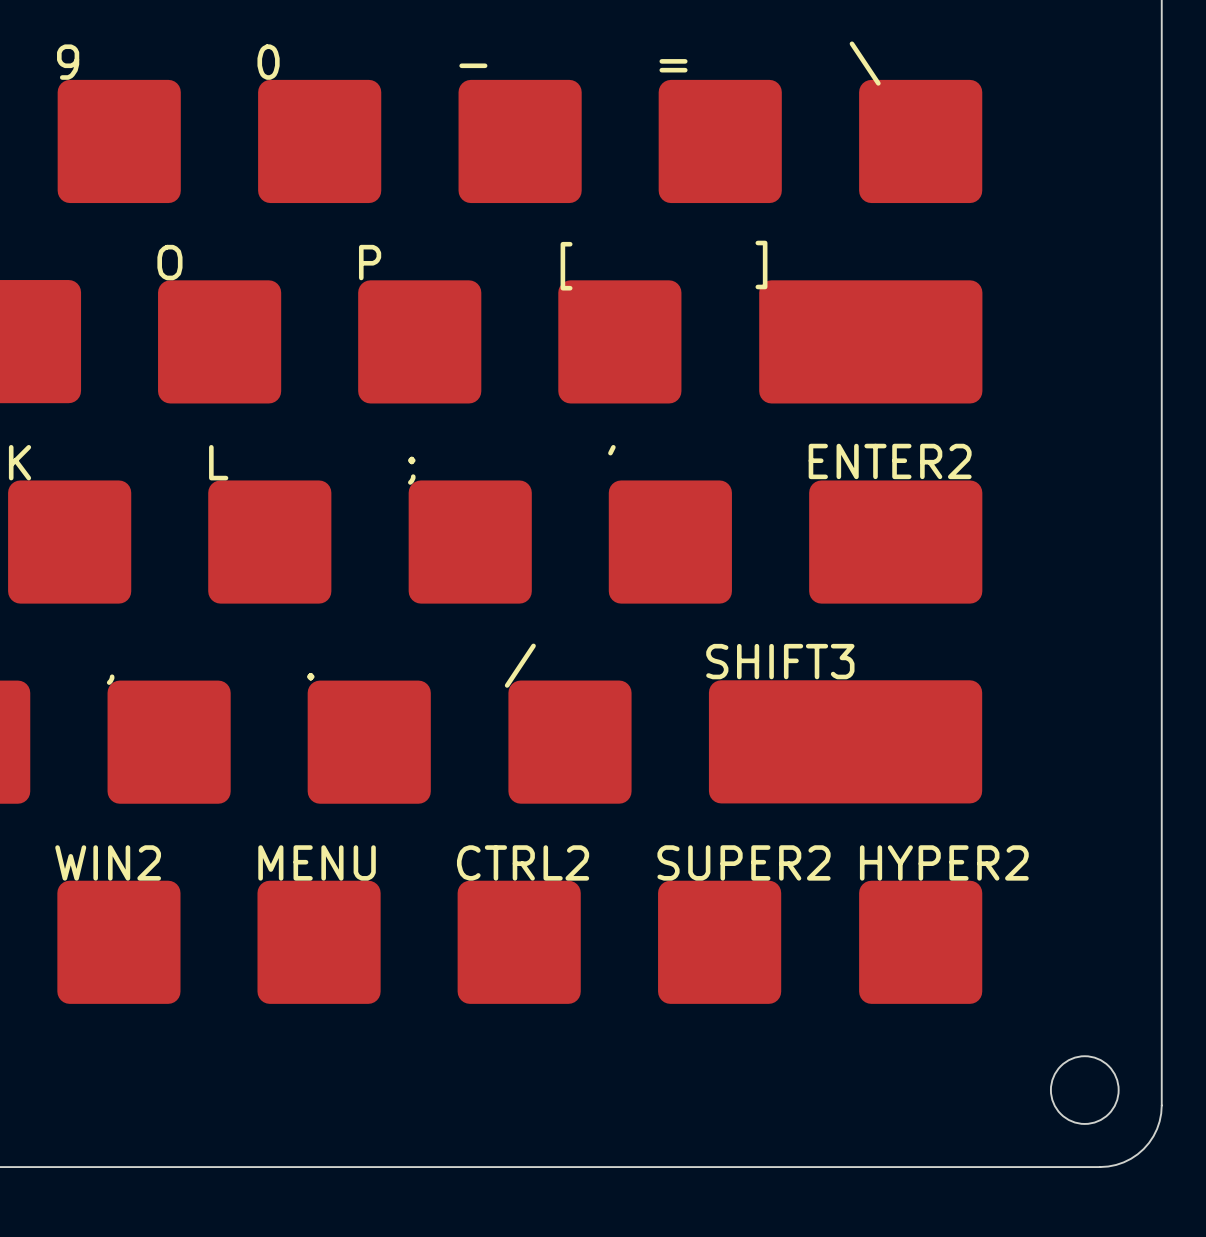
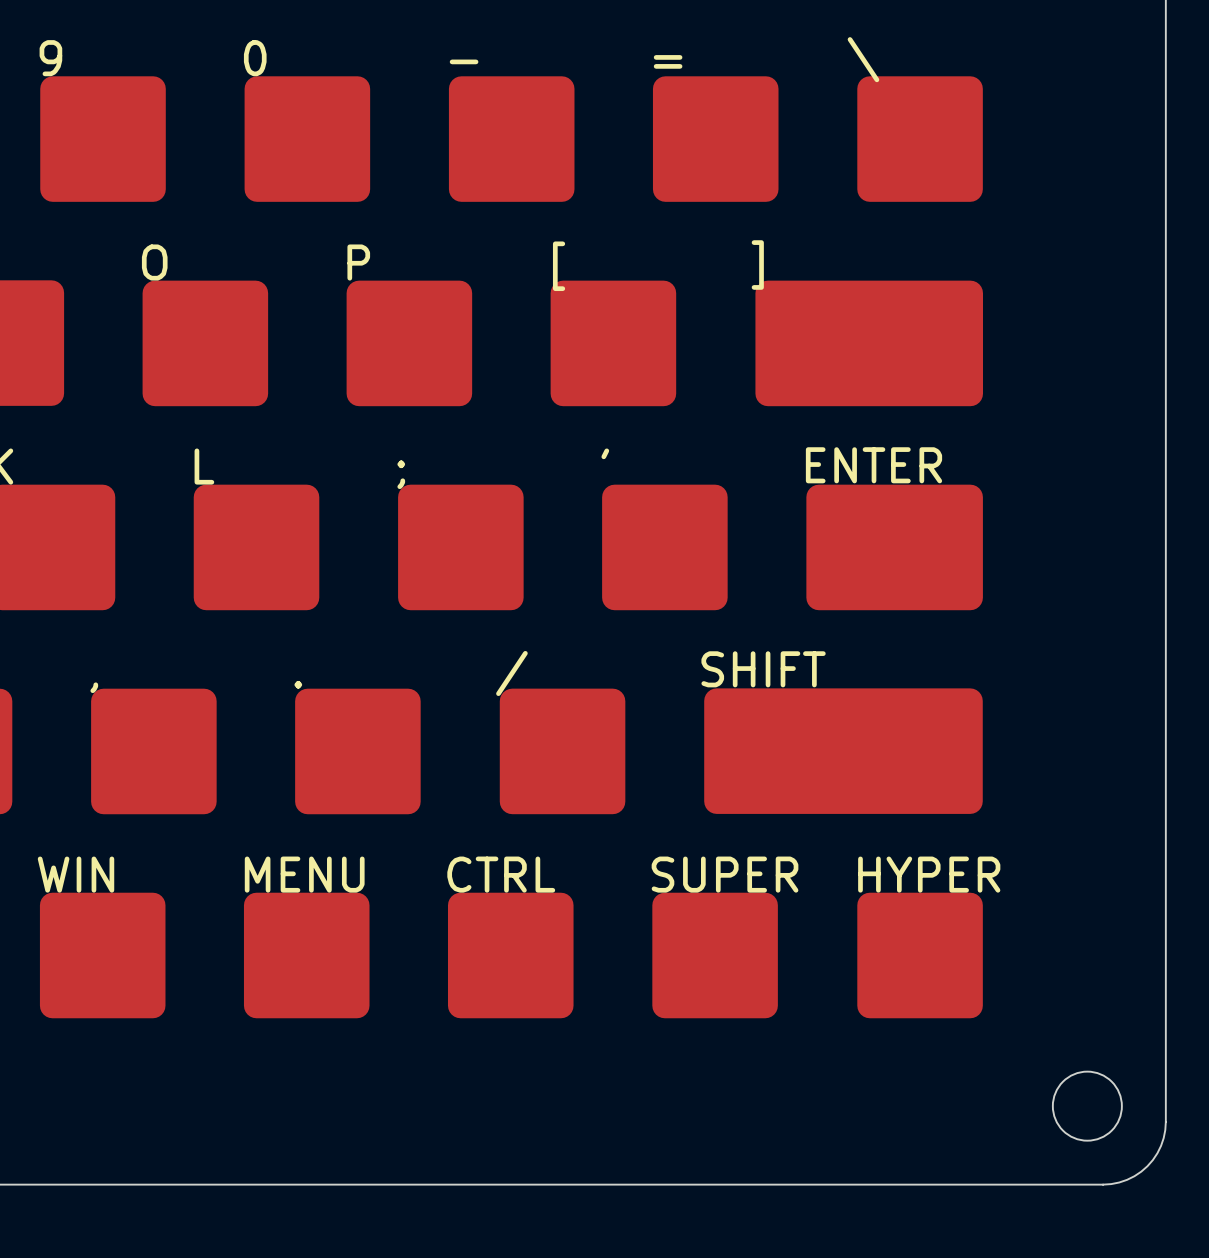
ENTER2 name: ENTER2 (890, 461) -> ENTER (873, 465)
SHIFT3 name: SHIFT3 (780, 661) -> SHIFT (763, 669)
WIN2 name: WIN2 (108, 862) -> WIN (76, 874)
CTRL2 name: CTRL2 (523, 862) -> CTRL (501, 874)
SUPER2 name: SUPER2 (744, 862) -> SUPER (725, 874)
HYPER2 name: HYPER2 (944, 862) -> HYPER (929, 874)

